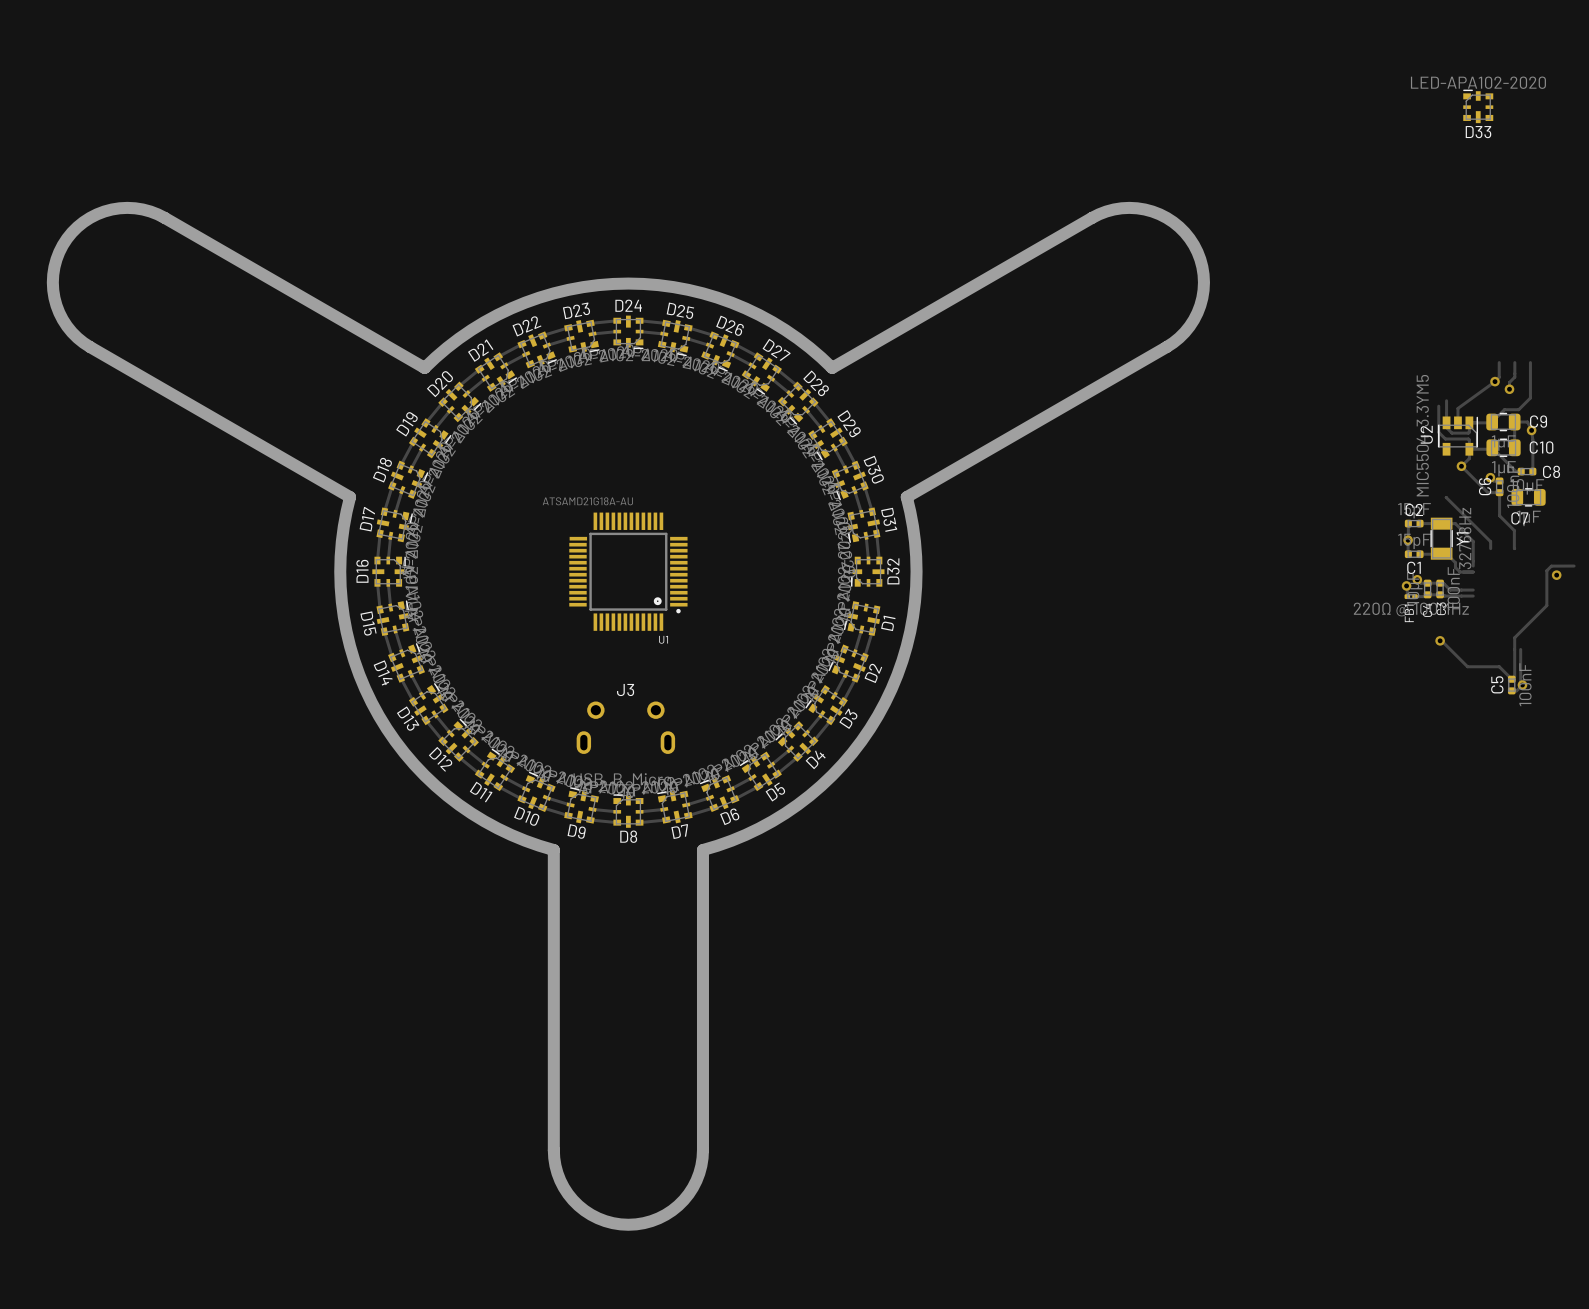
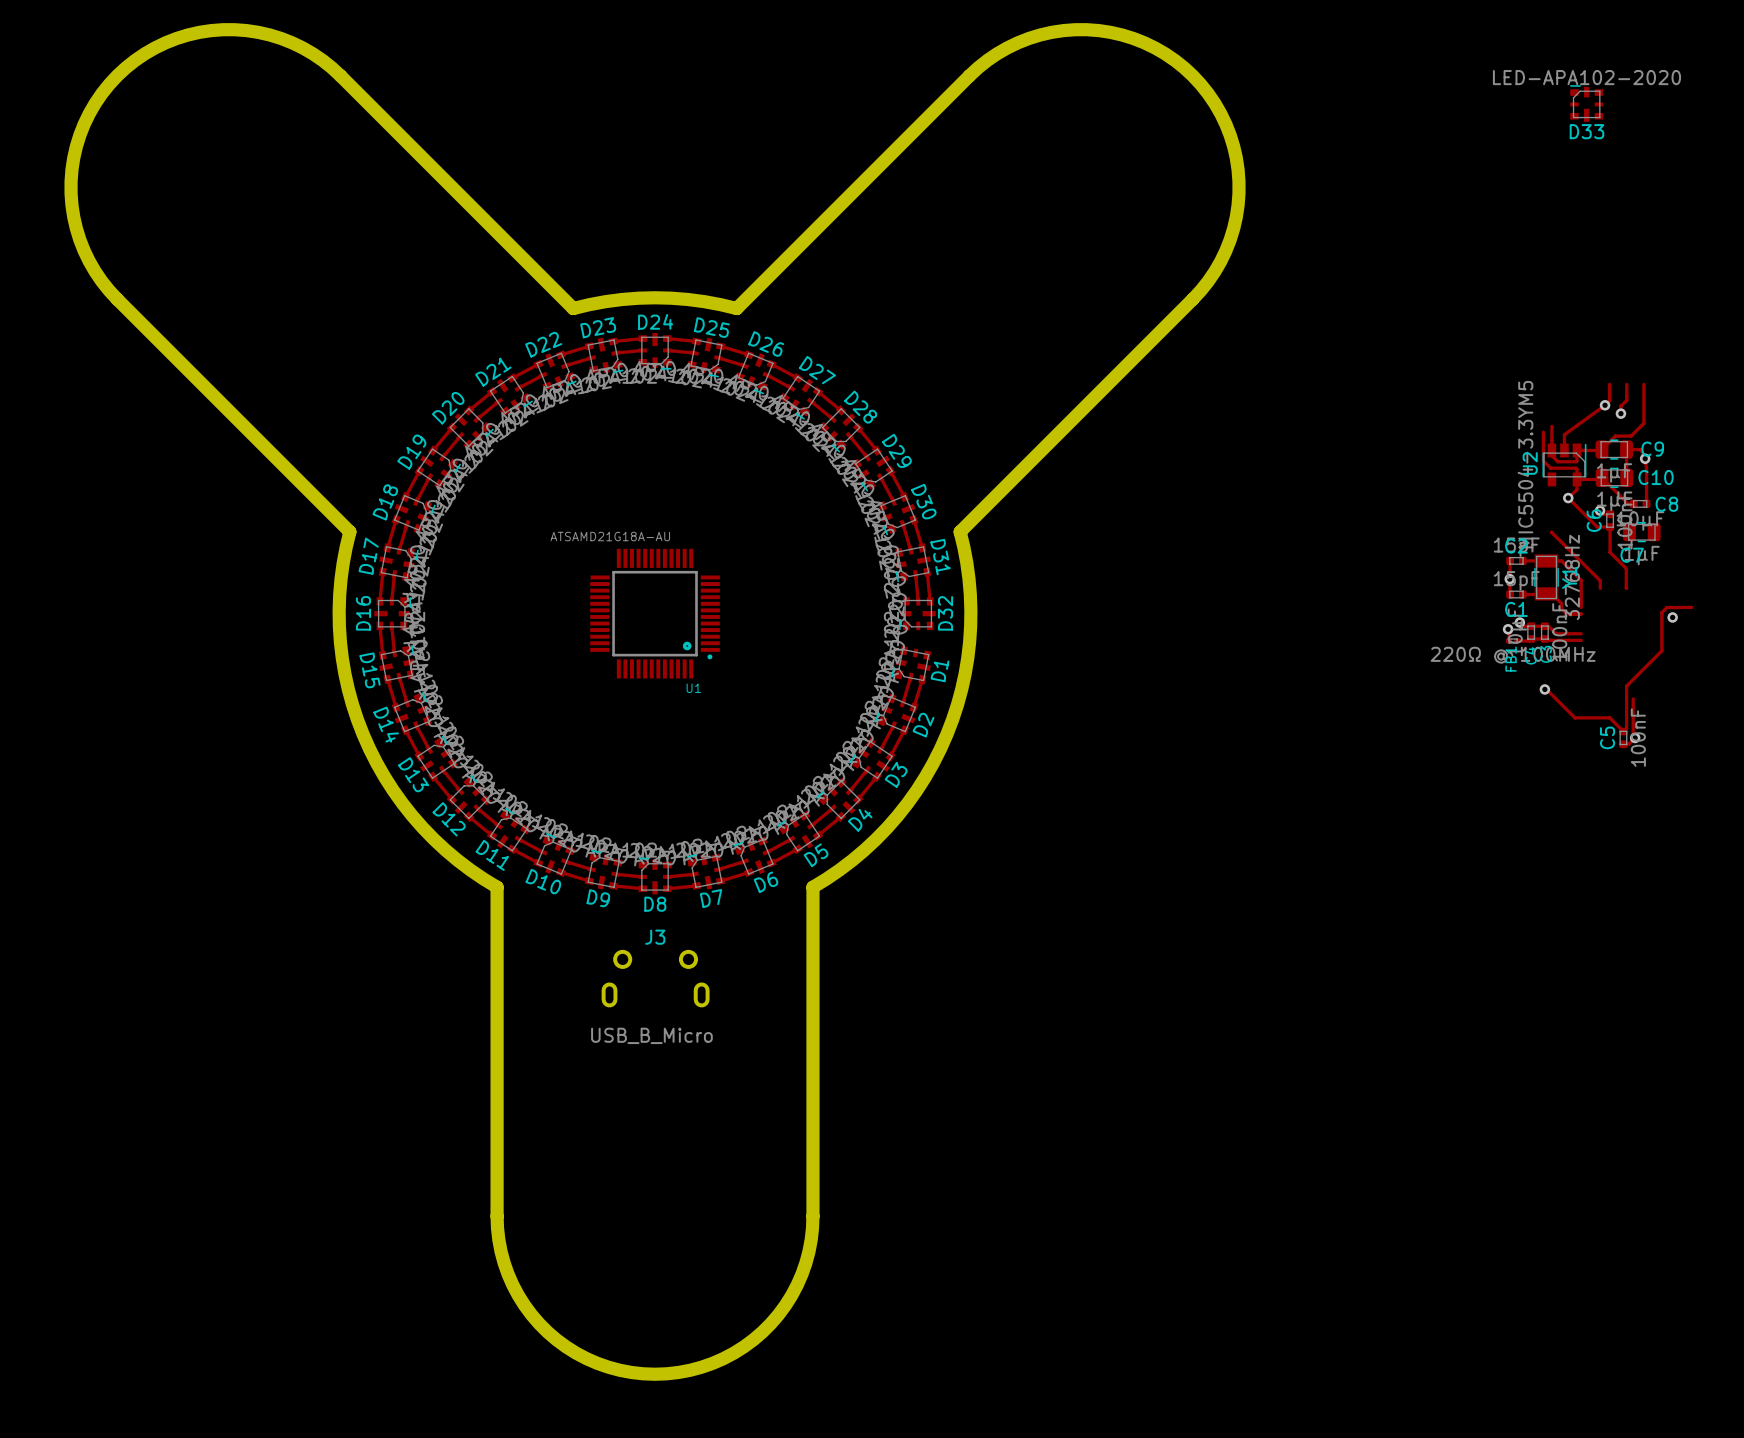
board edge: (164, 217) (424, 367) (459, 338) (484, 322) (511, 308) (539, 297) (568, 289) (598, 285) (628, 283) (658, 285) (688, 289) (717, 297) (745, 308) (772, 322) (797, 338) (832, 367) (1092, 217) (1106, 211) (1121, 208) (1137, 208) (1159, 214) (1173, 222) (1184, 232) (1197, 252) (1203, 274) (1202, 297) (1193, 319) (1179, 337) (1166, 347) (906, 497) (913, 526) (916, 556) (914, 601) (910, 631) (902, 660) (891, 688) (877, 715) (861, 741) (842, 764) (821, 785) (797, 804) (772, 821) (745, 834) (702, 850) (702, 1157) (699, 1173) (688, 1194) (672, 1210) (658, 1218) (636, 1224) (620, 1224) (605, 1221) (591, 1214) (578, 1205) (568, 1194) (560, 1180) (555, 1165) (553, 1150) (553, 850) (525, 840) (497, 828) (459, 804) (435, 785) (414, 764) (395, 741) (378, 715) (365, 688) (354, 660) (346, 631) (341, 601) (340, 556) (343, 526) (350, 497) (90, 347) (71, 332) (59, 312) (53, 290) (54, 266) (62, 245) (77, 227) (97, 214) (119, 208) (142, 209) (164, 217) -> (340, 75) (573, 308) (622, 299) (655, 297) (688, 299) (736, 308) (978, 67) (1007, 47) (1040, 34) (1063, 30) (1098, 30) (1122, 34) (1154, 47) (1174, 60) (1200, 84) (1220, 113) (1233, 146) (1238, 181) (1236, 216) (1225, 250) (1208, 281) (1192, 299) (960, 531) (968, 578) (970, 626) (965, 673) (957, 704) (946, 734) (925, 777) (897, 815) (864, 850) (839, 869) (812, 887) (812, 1216) (811, 1239) (805, 1262) (791, 1295) (770, 1323) (753, 1339) (733, 1353) (701, 1367) (666, 1373) (643, 1373) (619, 1370) (597, 1363) (576, 1353) (547, 1332) (531, 1314) (518, 1295) (504, 1262) (497, 1228) (497, 887) (457, 860) (433, 839) (412, 815) (384, 777) (363, 734) (348, 689) (340, 642) (339, 594) (343, 562) (349, 531) (109, 290) (89, 261) (76, 228) (71, 205) (71, 181) (73, 158) (84, 124) (95, 103) (109, 84) (125, 67) (144, 53) (165, 42) (199, 32) (222, 29) (246, 30) (269, 34) (292, 42) (322, 60) (331, 67) (340, 75)
J3 position: (625, 727) -> (655, 978)

